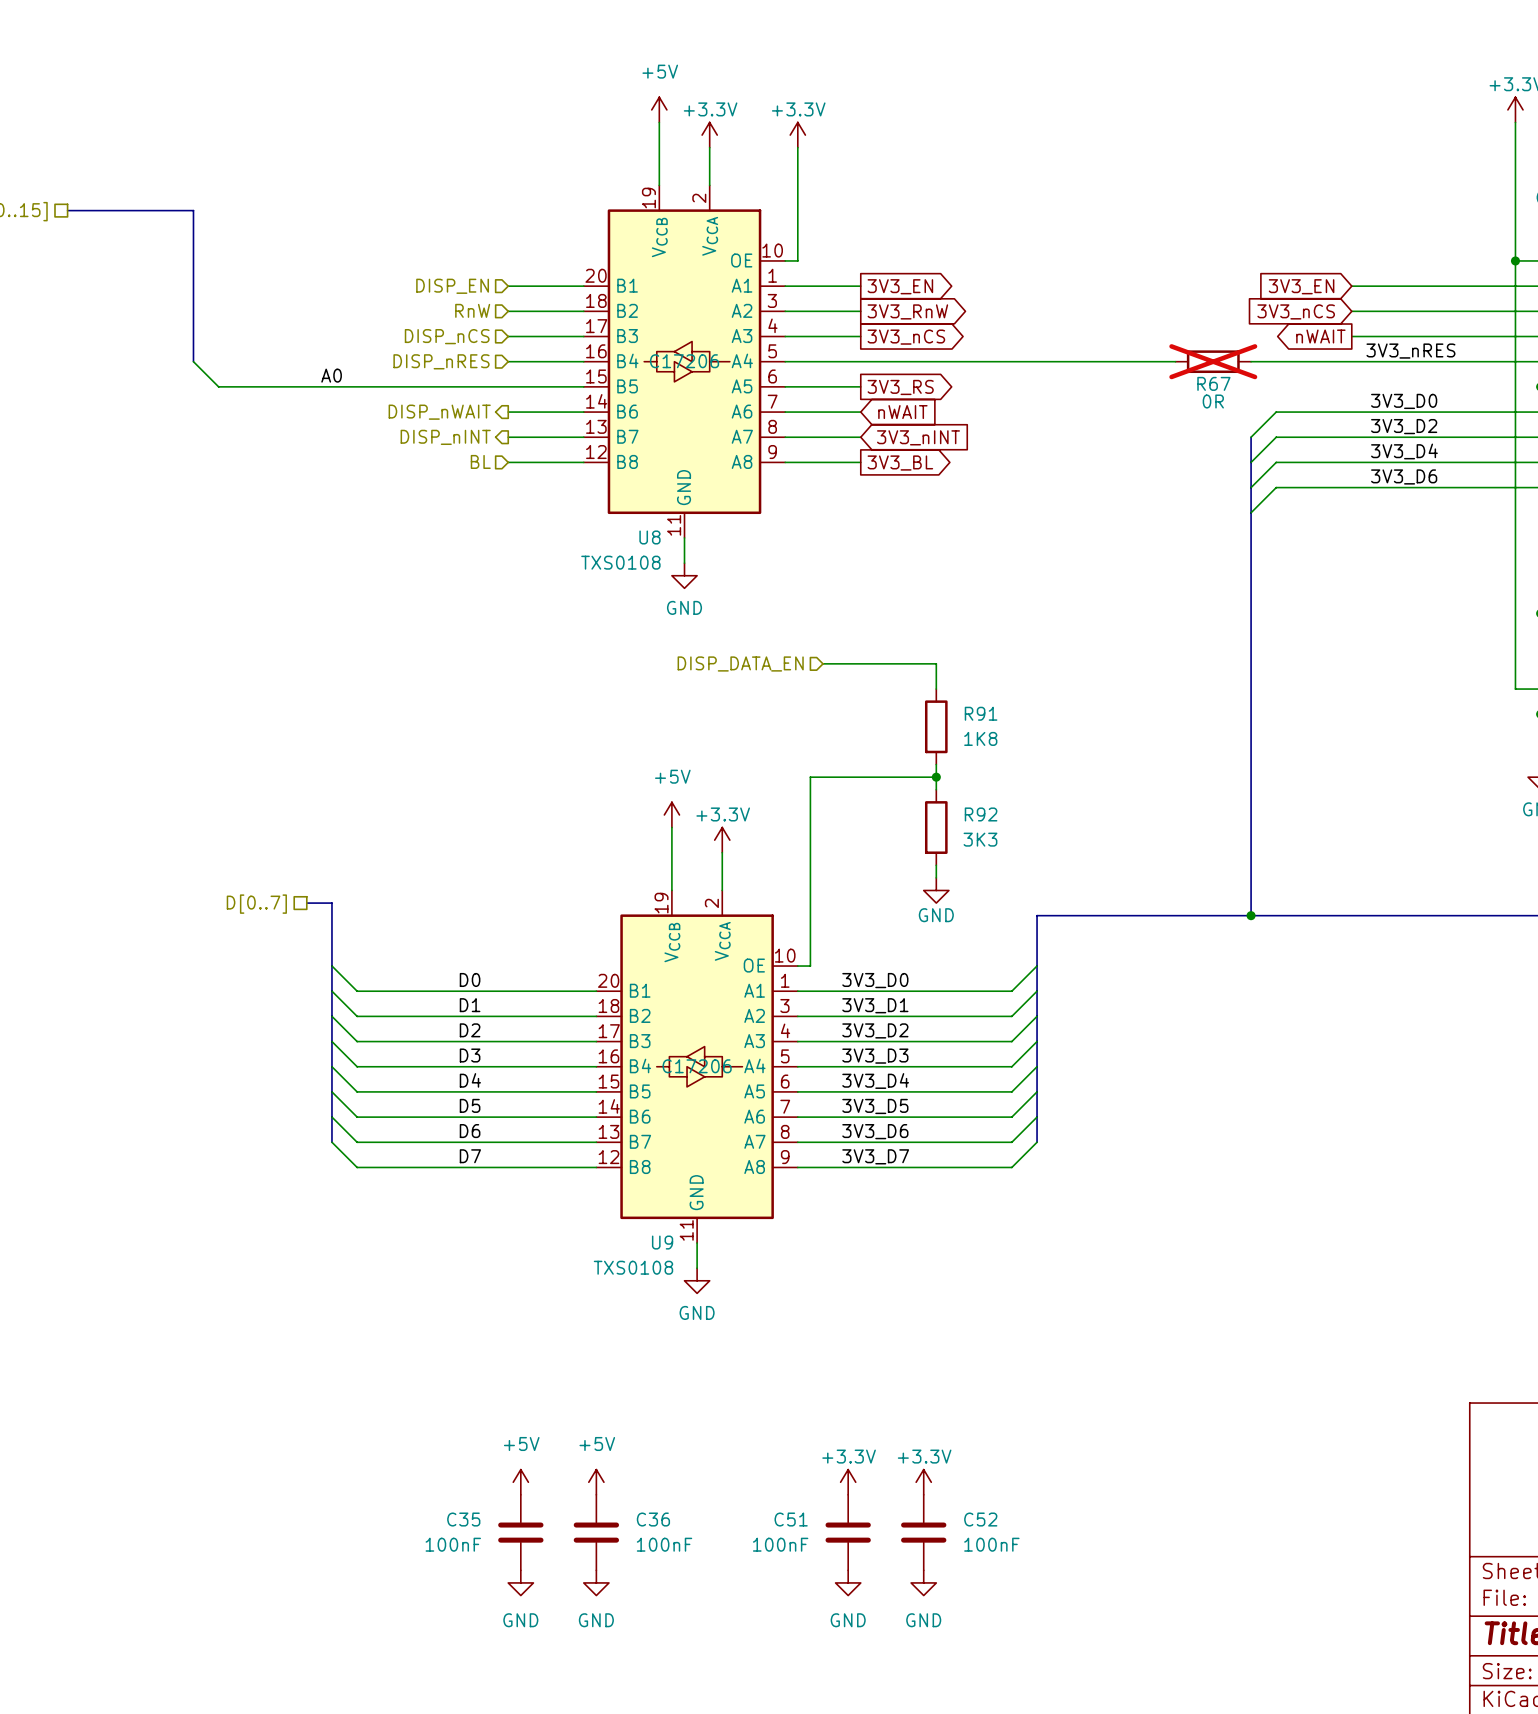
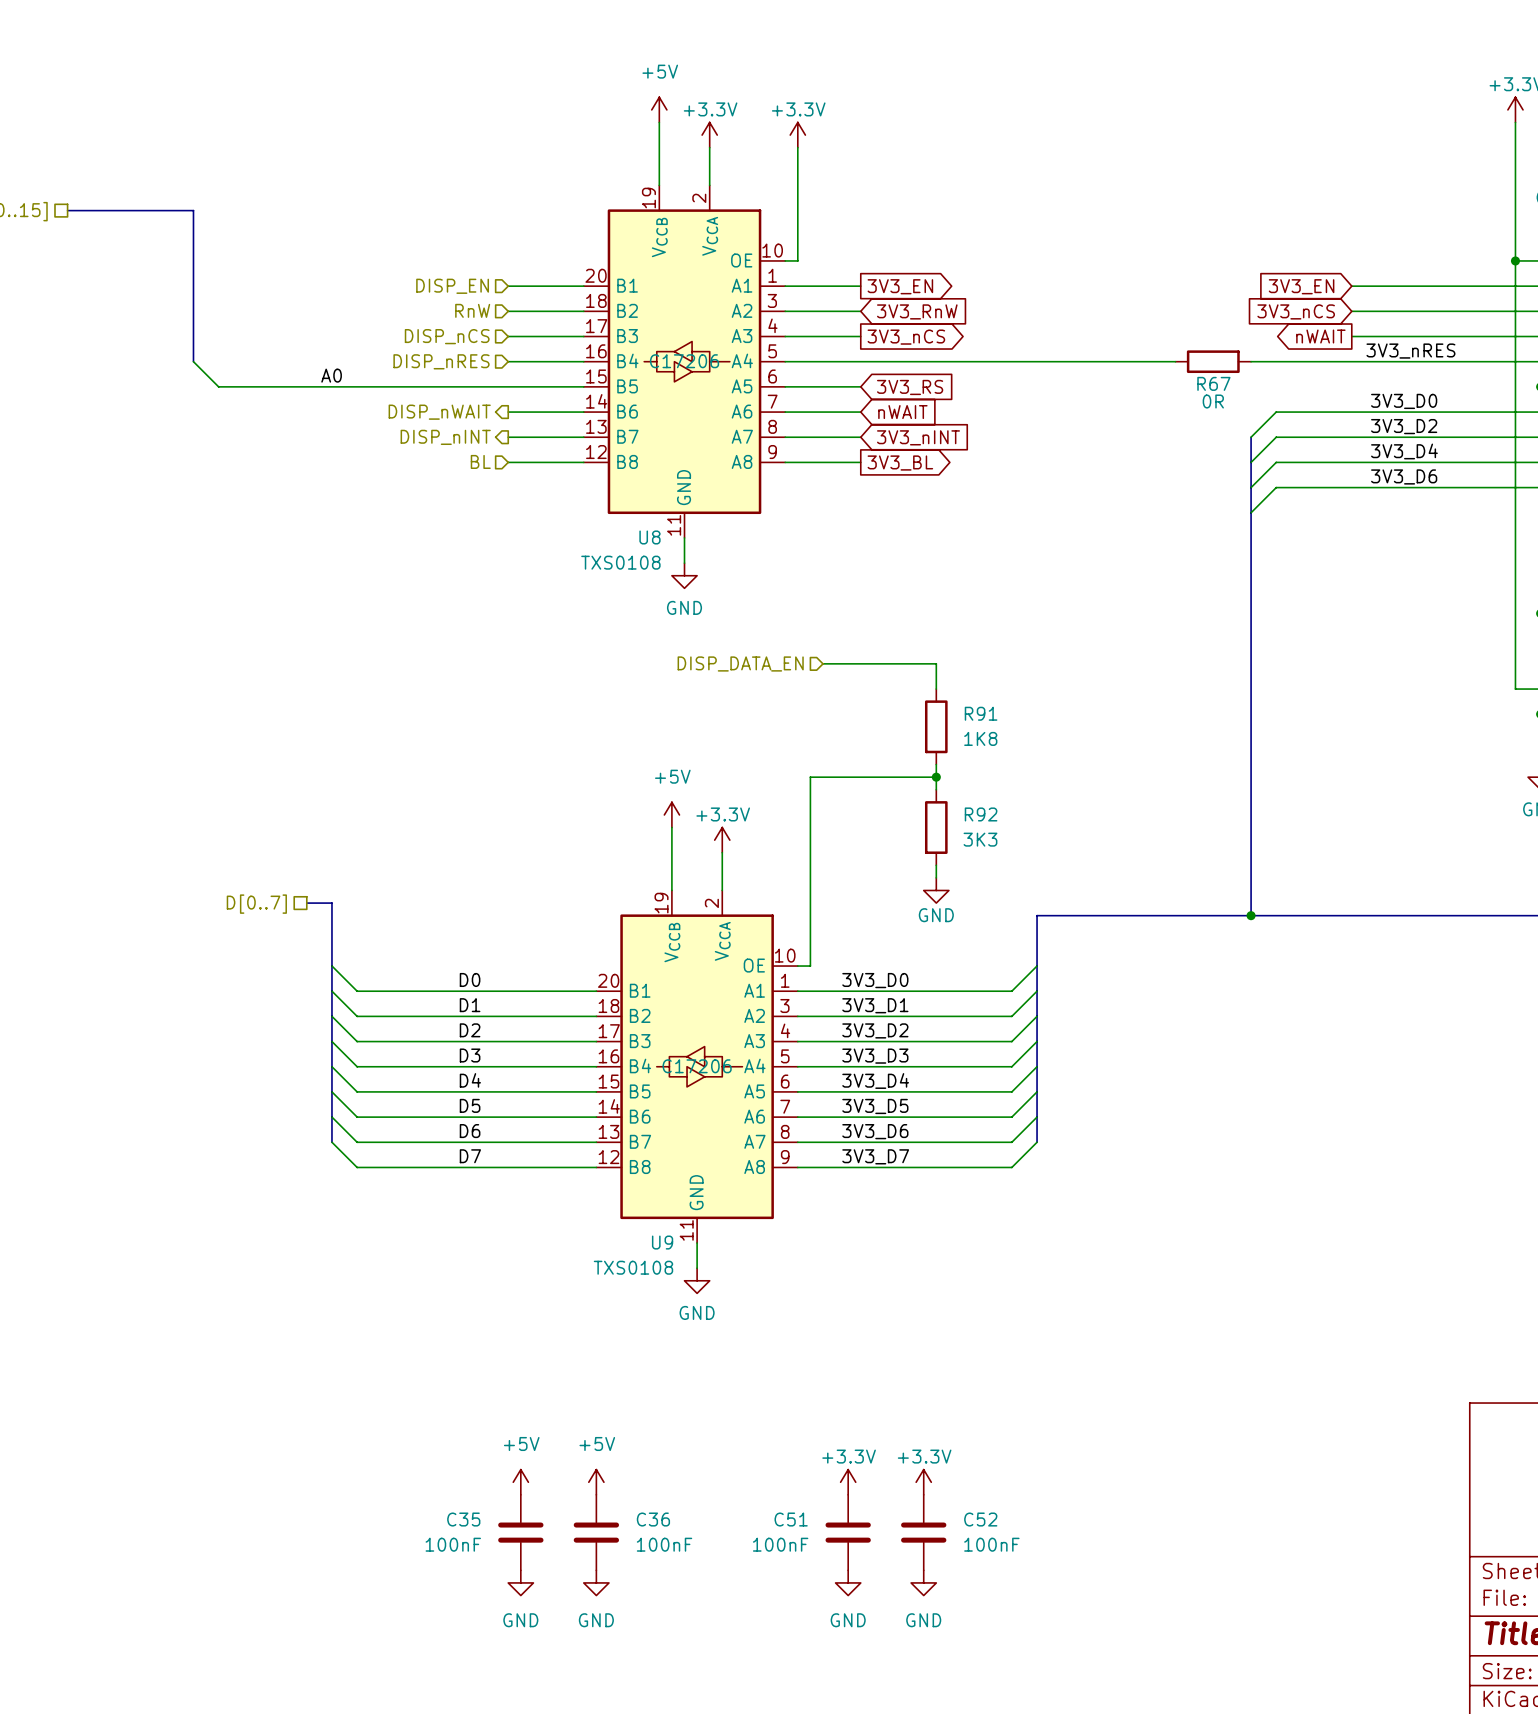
global label shape: output (907, 311) -> input (917, 311)
R67 do-not-place cross: (1213, 361) -> none
global label shape: output (900, 387) -> input (910, 387)

